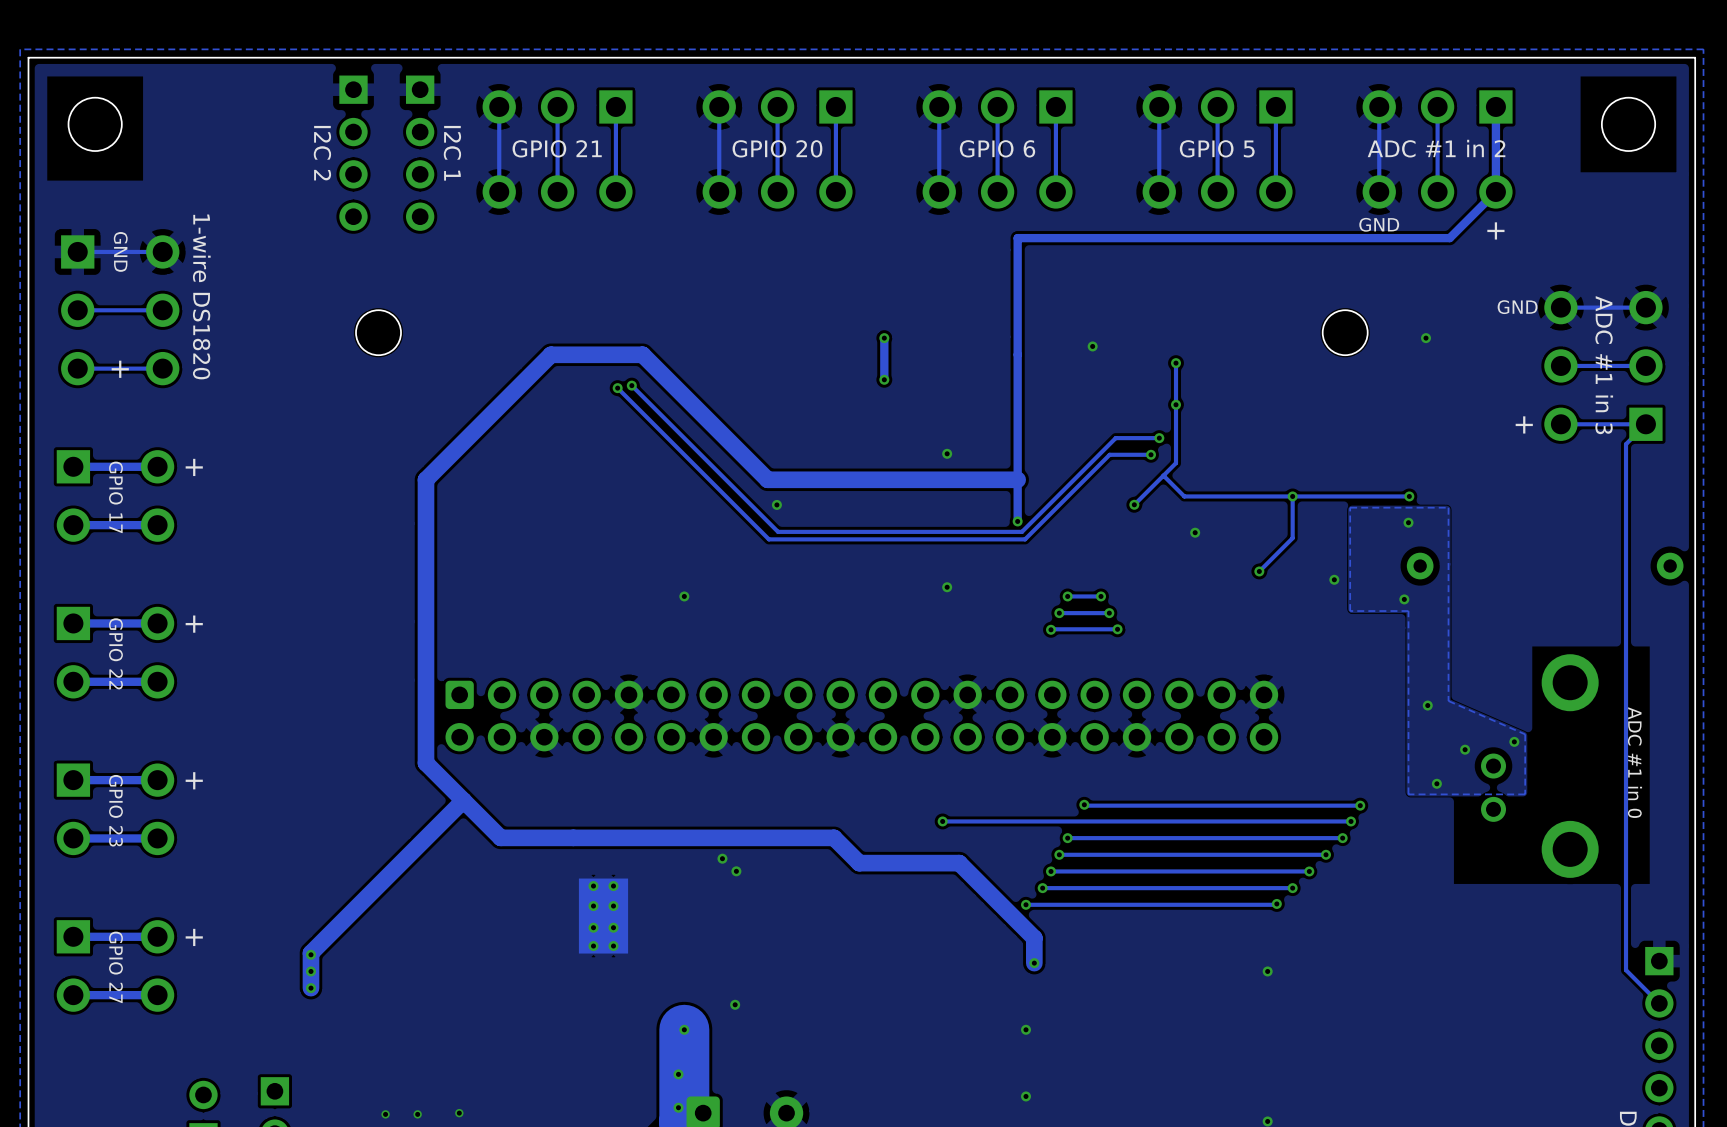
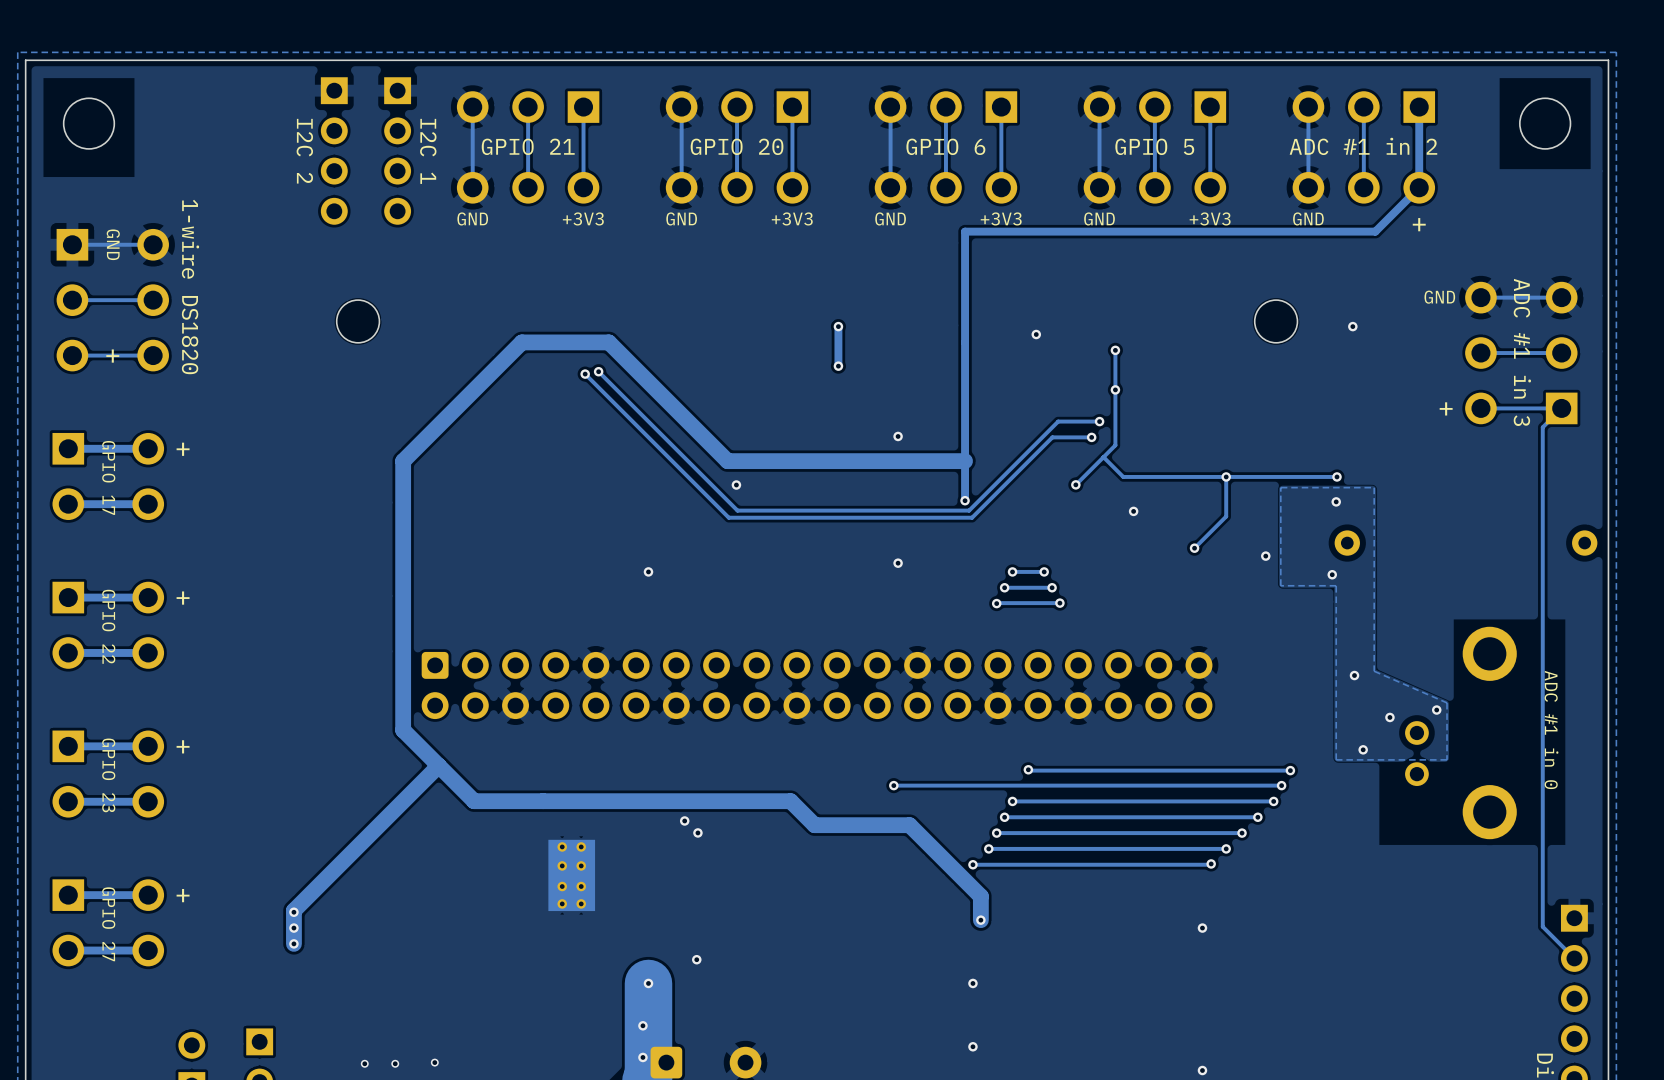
text: none -> GND (472, 218)
text: none -> +3V3 (583, 218)
text: none -> GND (681, 218)
text: none -> +3V3 (792, 218)
text: none -> GND (890, 218)
text: none -> +3V3 (1001, 218)
text: none -> GND (1099, 218)
text: none -> +3V3 (1210, 218)

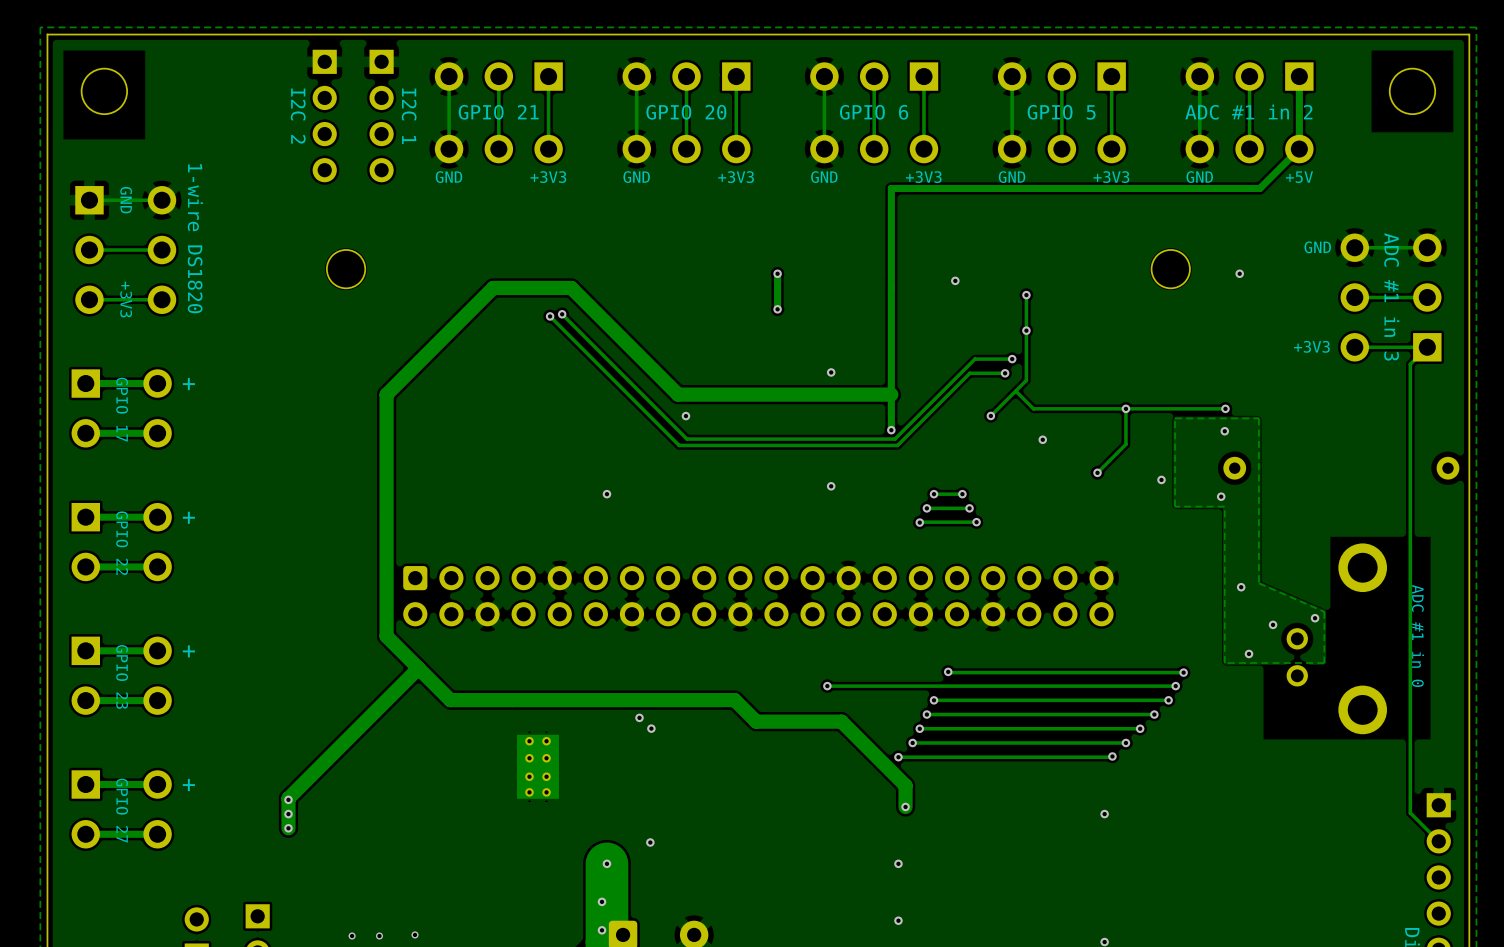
text: + (1419, 224) -> +5V (1299, 177)
text: + (112, 356) -> +3V3 (126, 299)
text: + (1446, 408) -> +3V3 (1311, 346)

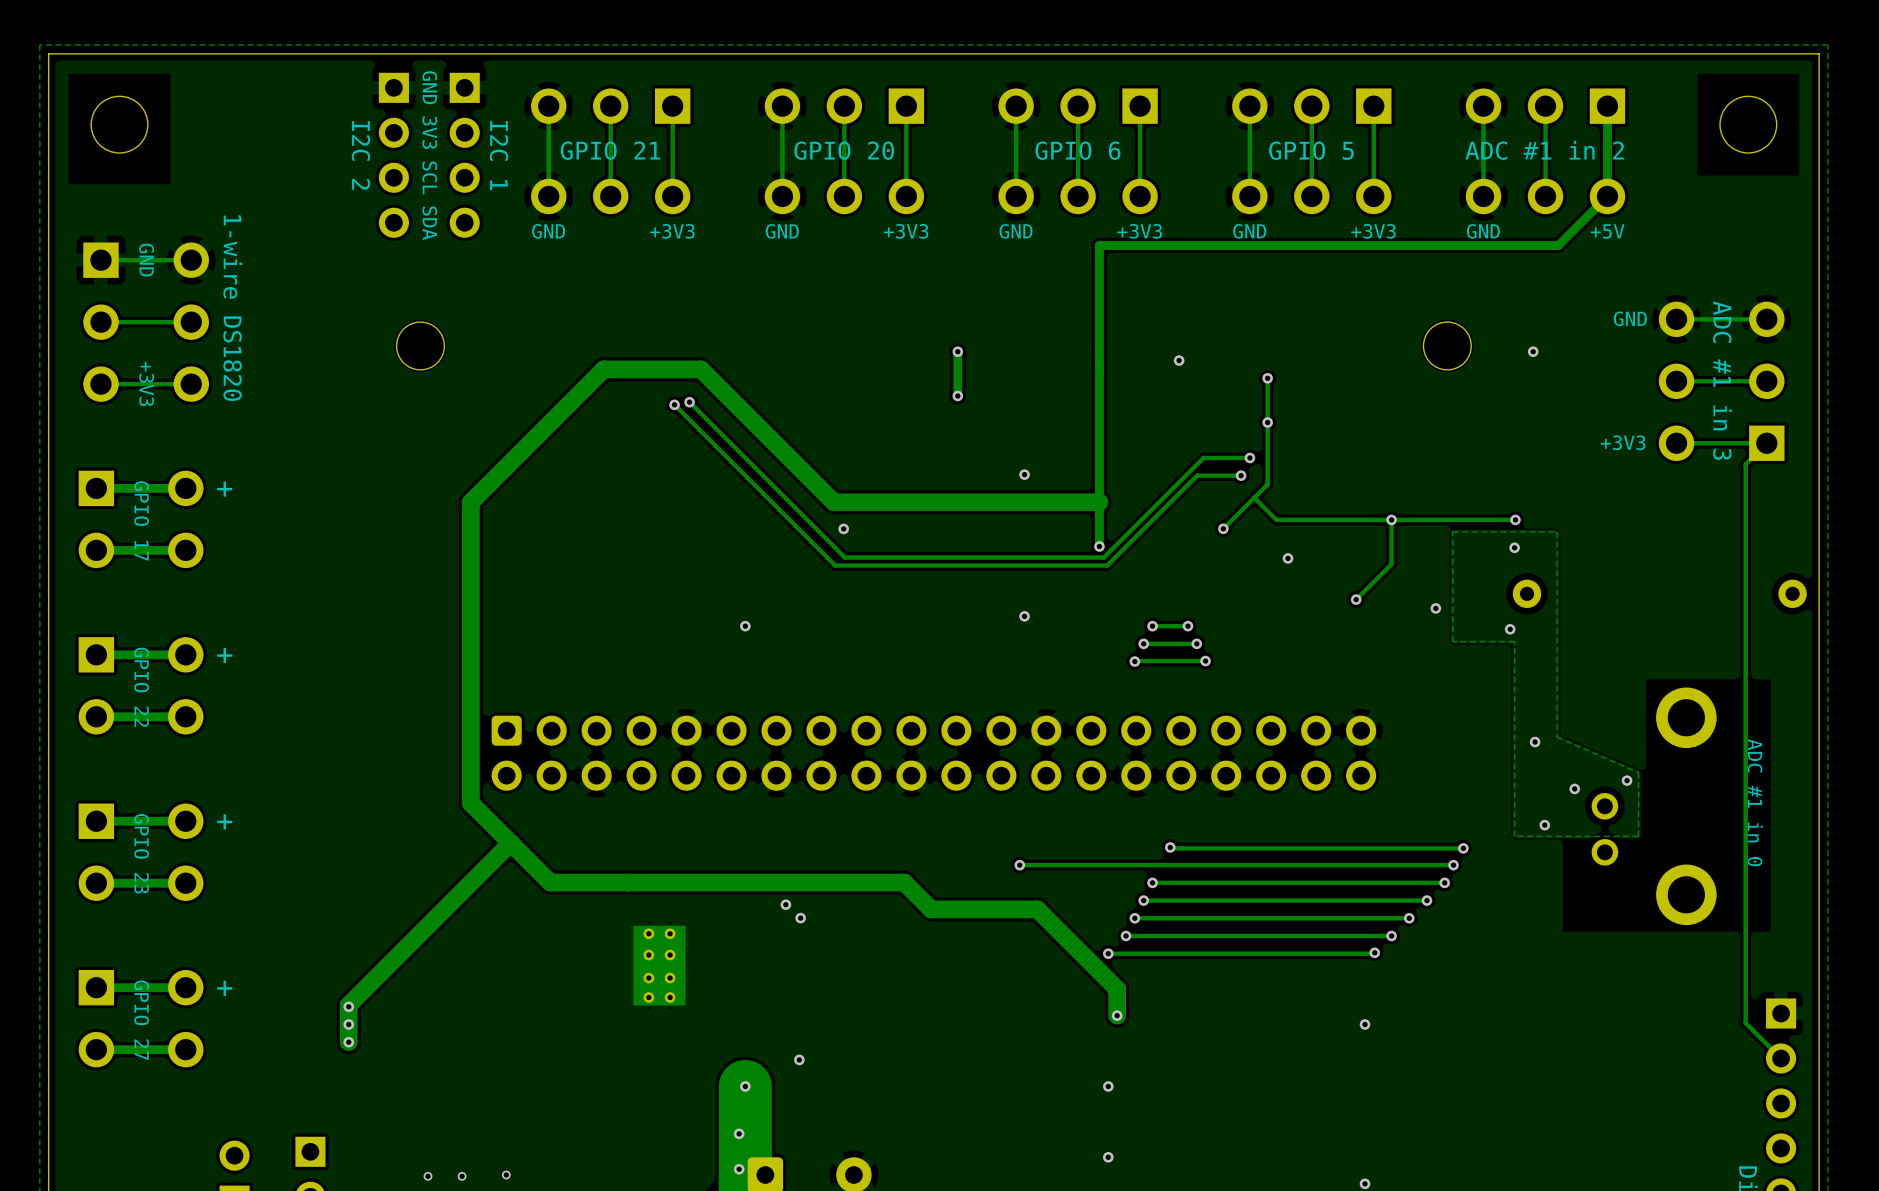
text: none -> GND (429, 87)
text: none -> 3V3 (429, 132)
text: none -> SCL (429, 177)
text: none -> SDA (429, 223)

